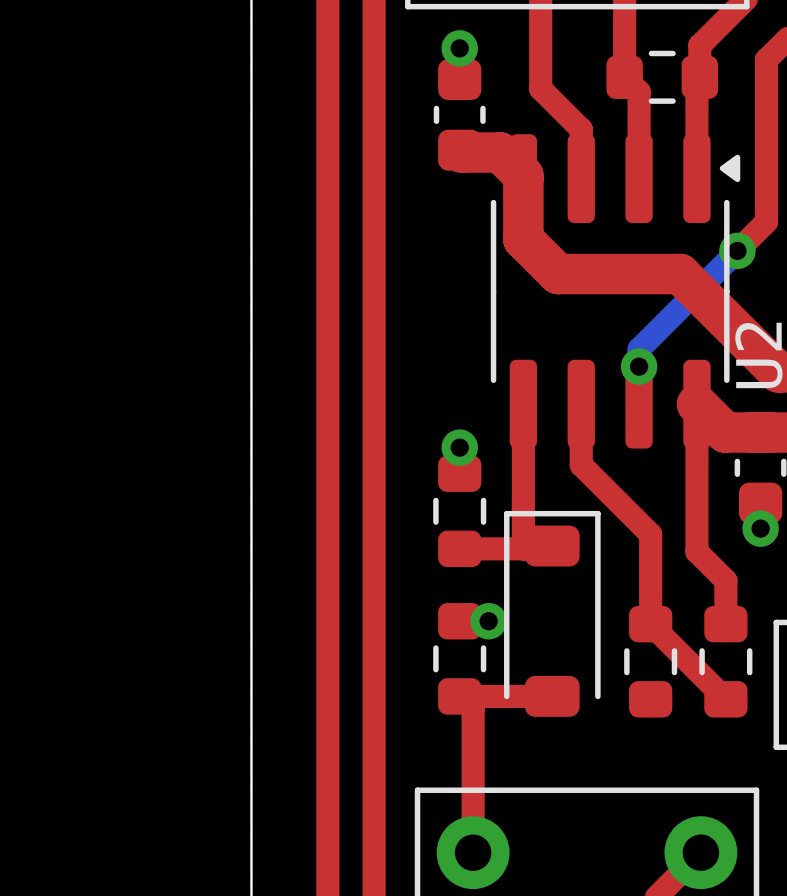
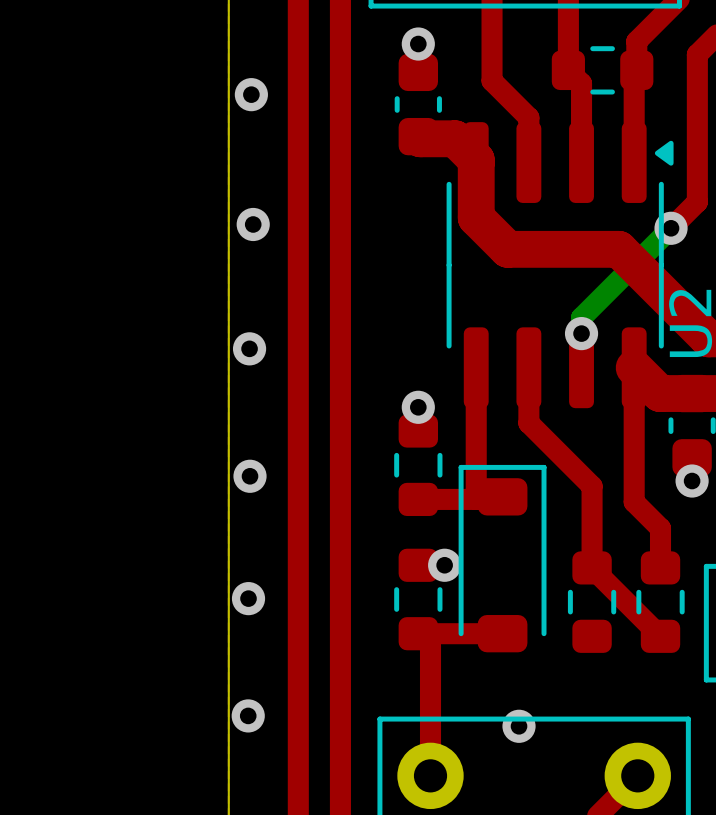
via: none -> (251, 94)
via: none -> (253, 224)
via: none -> (249, 348)
via: none -> (250, 476)
via: none -> (248, 598)
via: none -> (248, 715)
via: none -> (519, 726)

